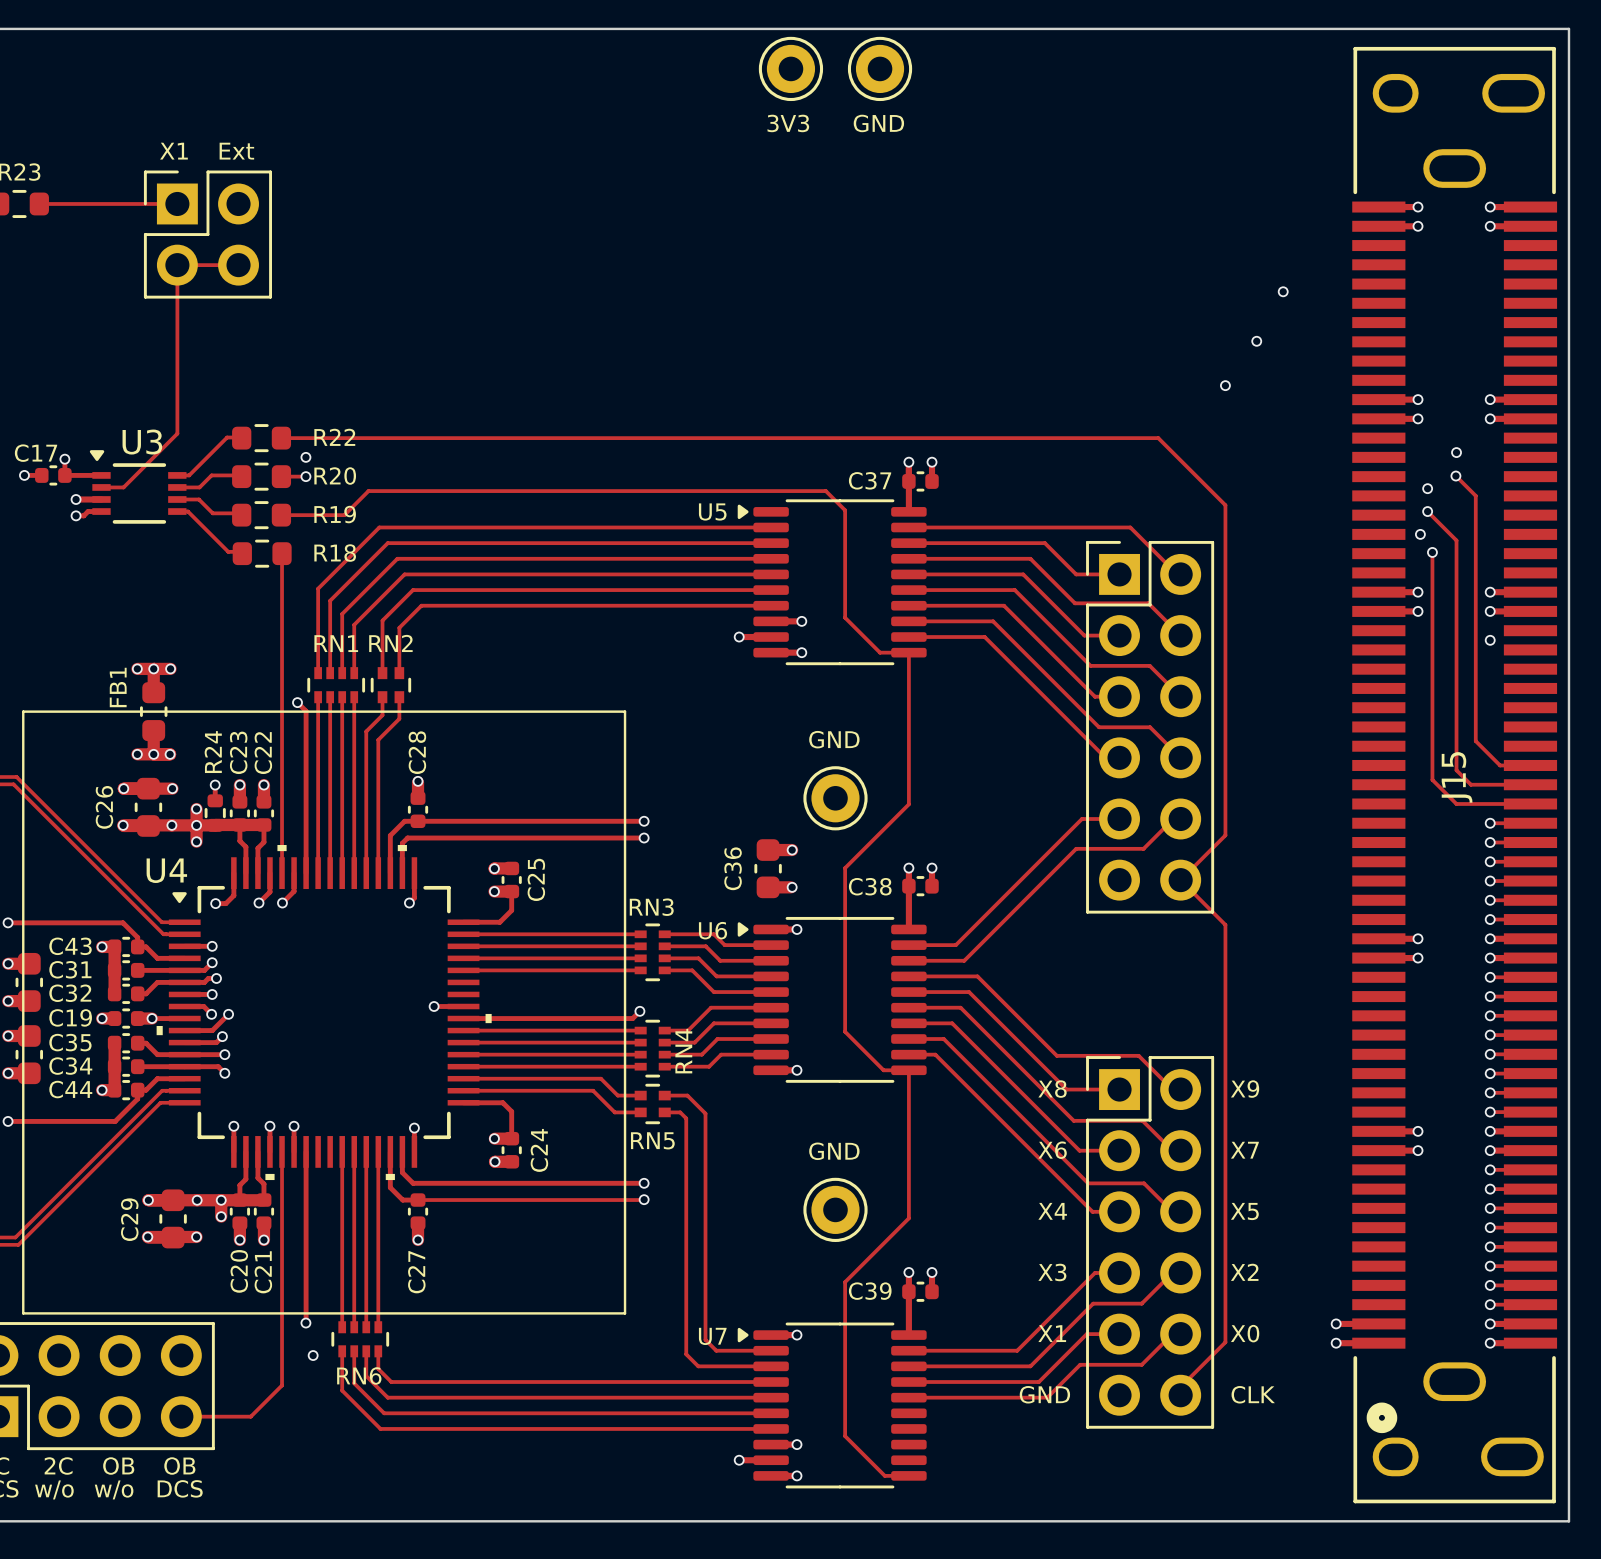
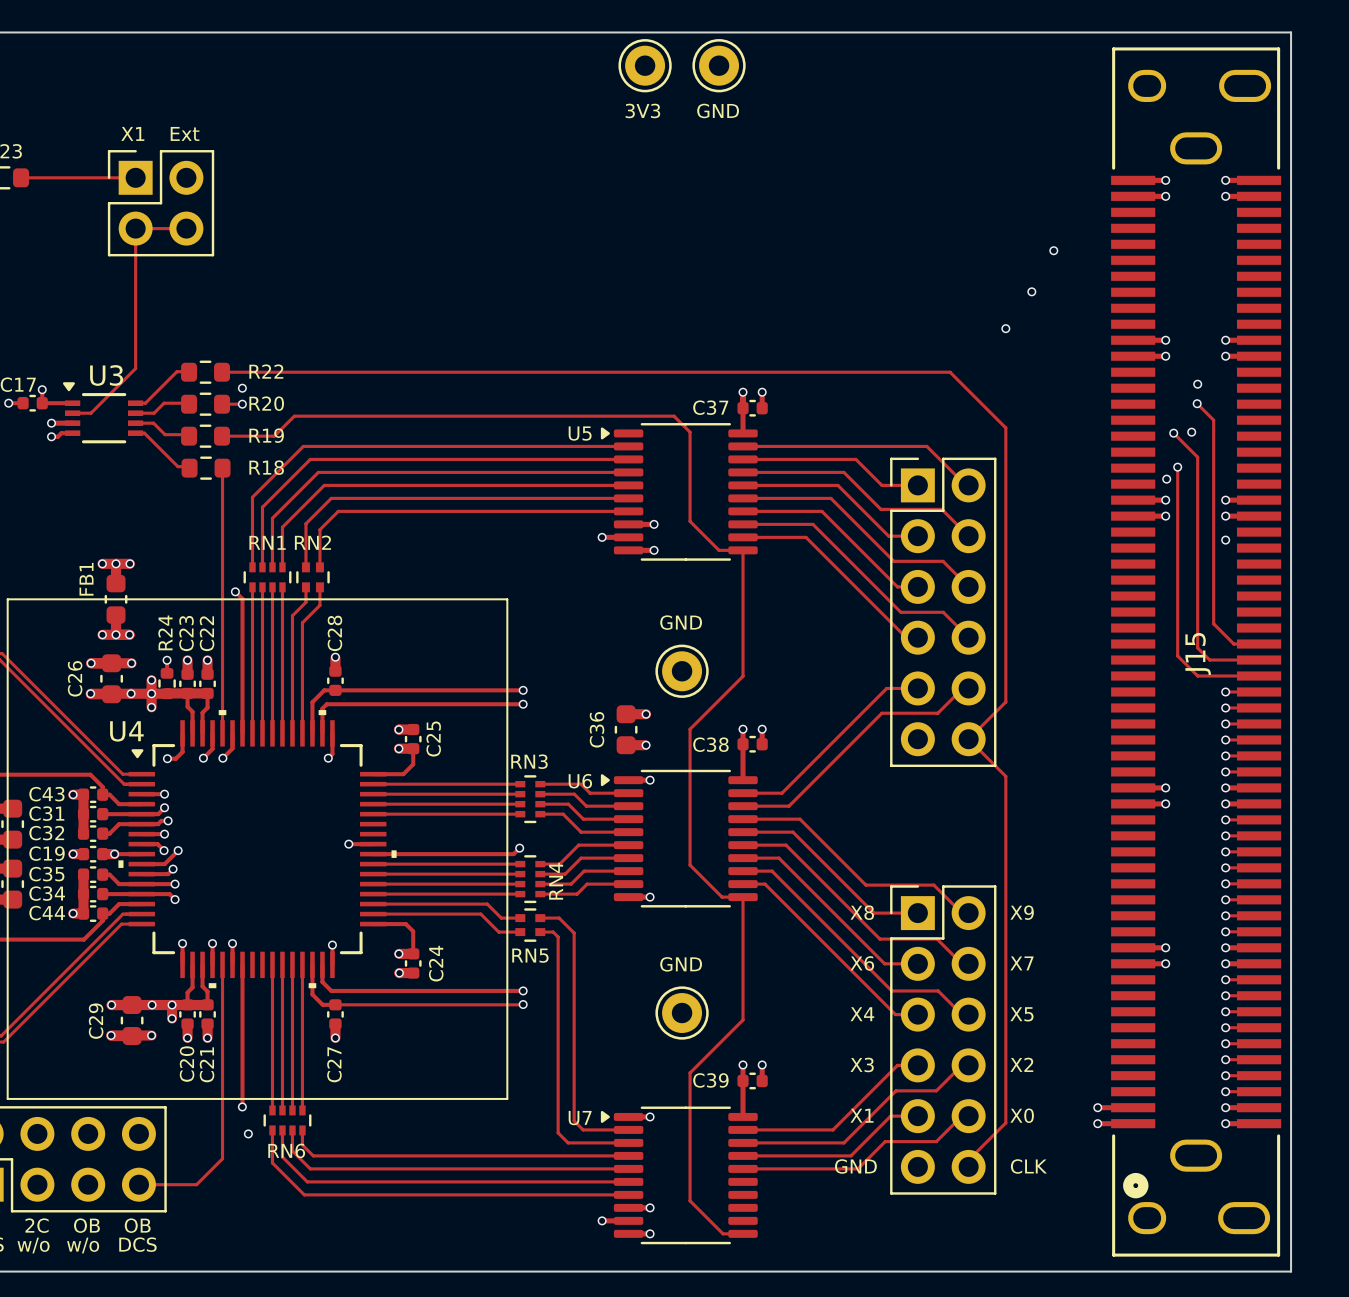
via: (1427, 488) -> none
via: none -> (1191, 432)
via: (1420, 534) -> none
via: none -> (1166, 479)

